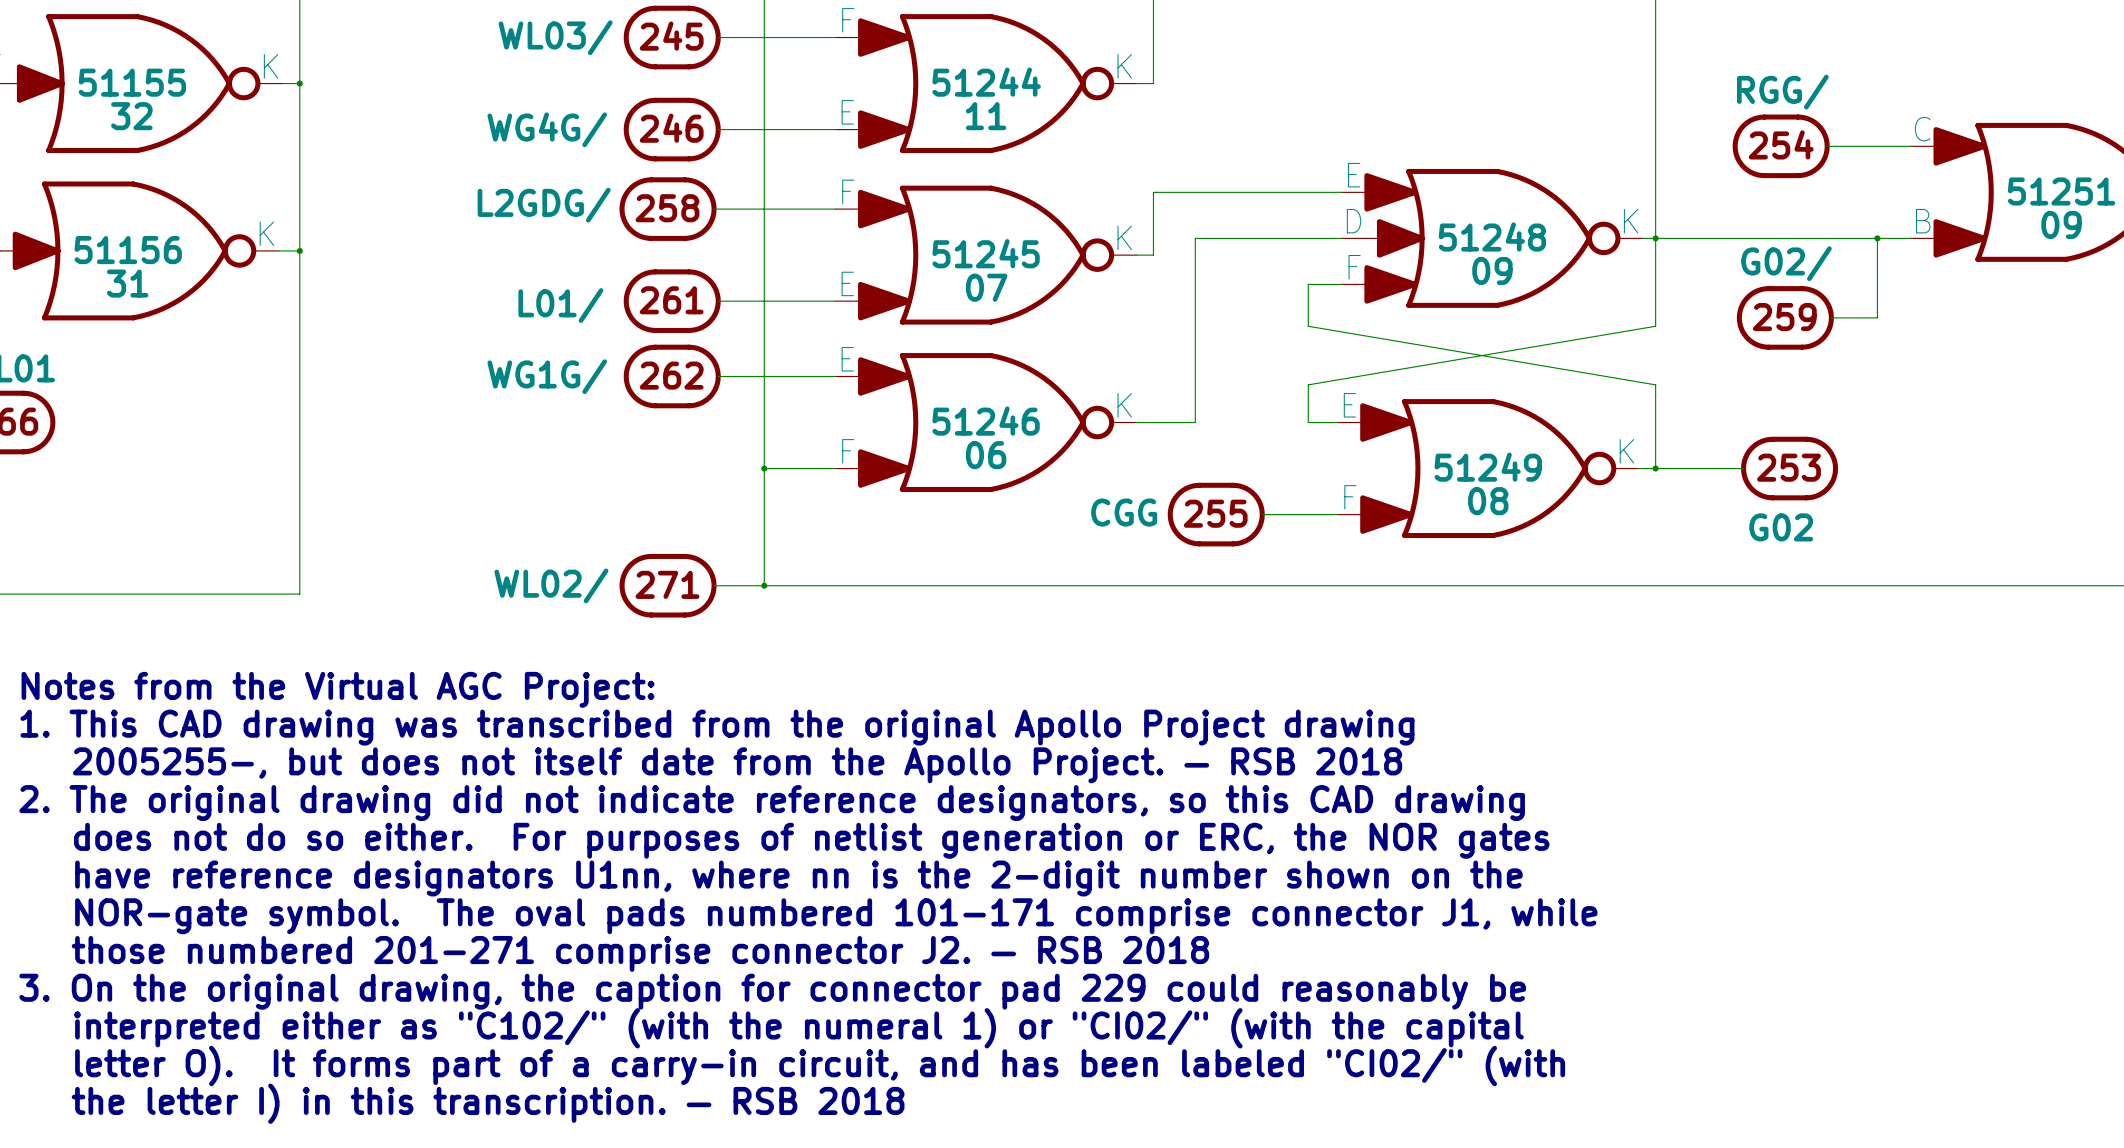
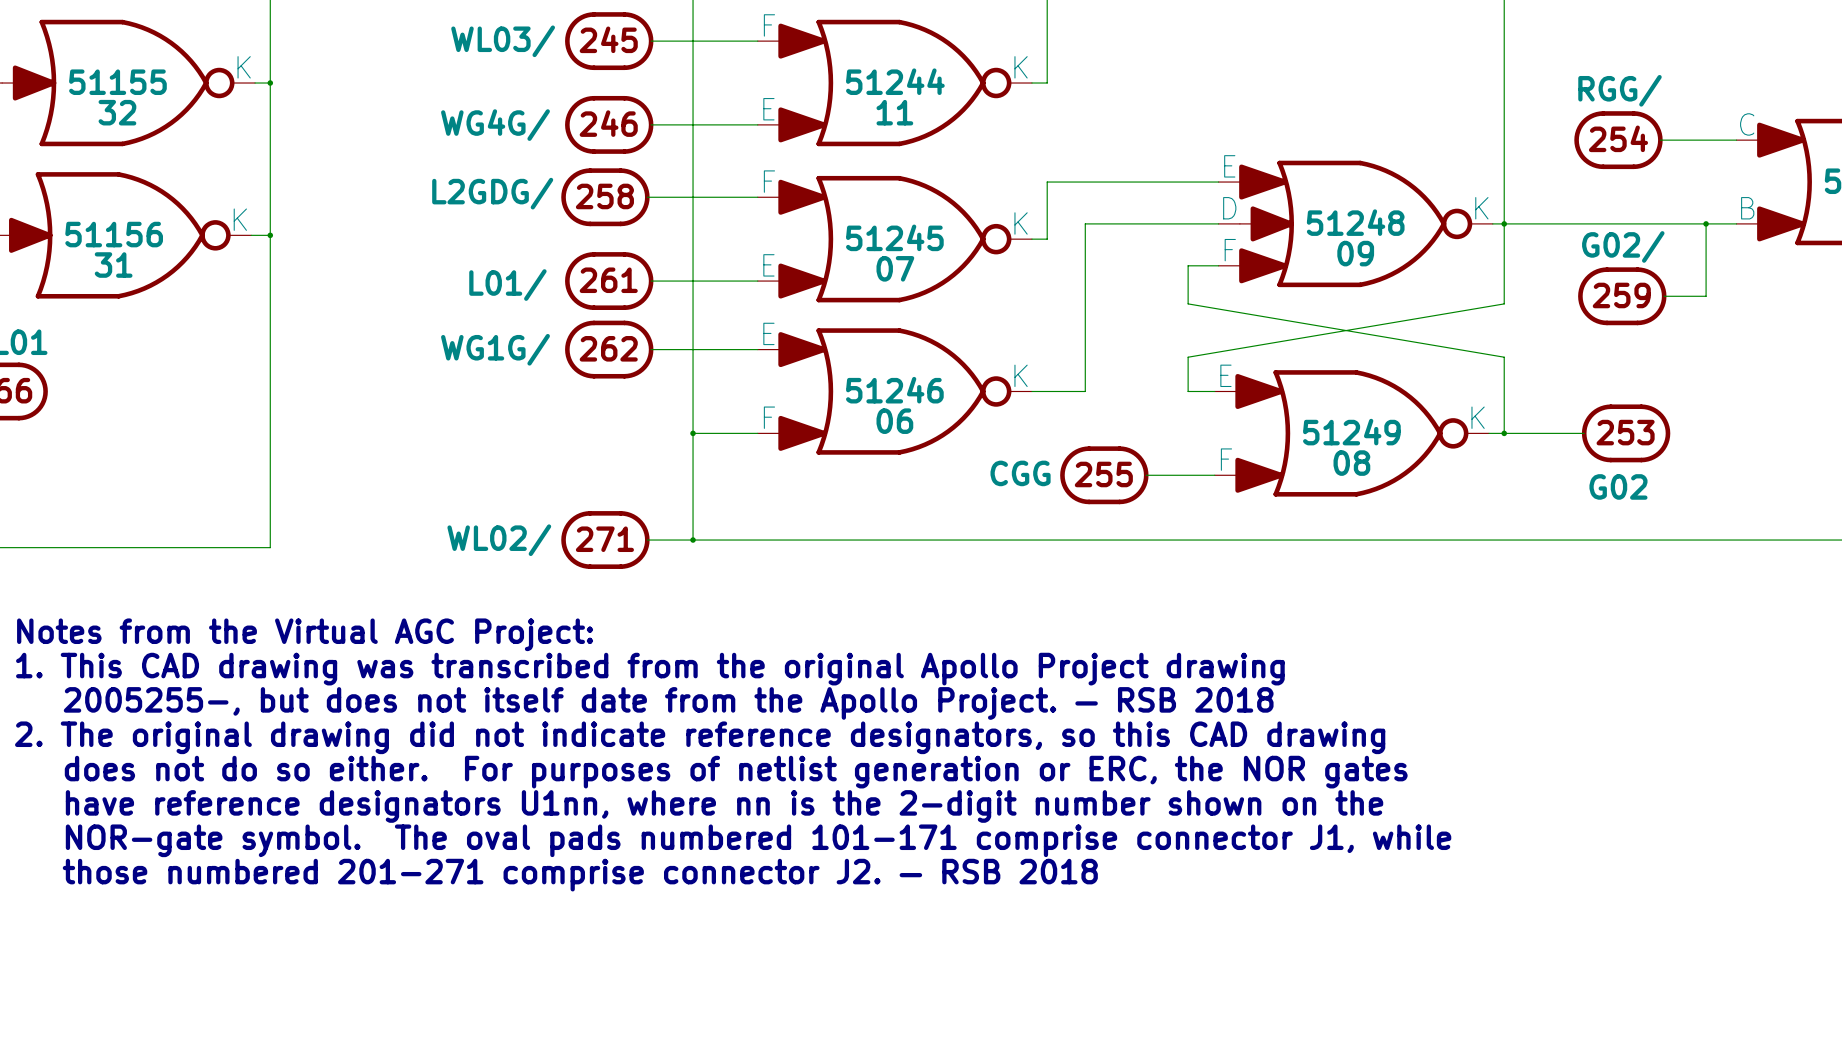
text: 3. On the original drawing, the caption for connector pad 229 could reasonably be (772, 991) -> none
text: interpreted either as "C102/" (with the numeral 1) or "CI02/" (with the capital (798, 1028) -> none
text: letter O). It forms part of a carry-in circuit, and has been labeled "CI02/" (with (820, 1066) -> none
text: the letter I) in this transcription. — RSB 2018 (488, 1103) -> none

